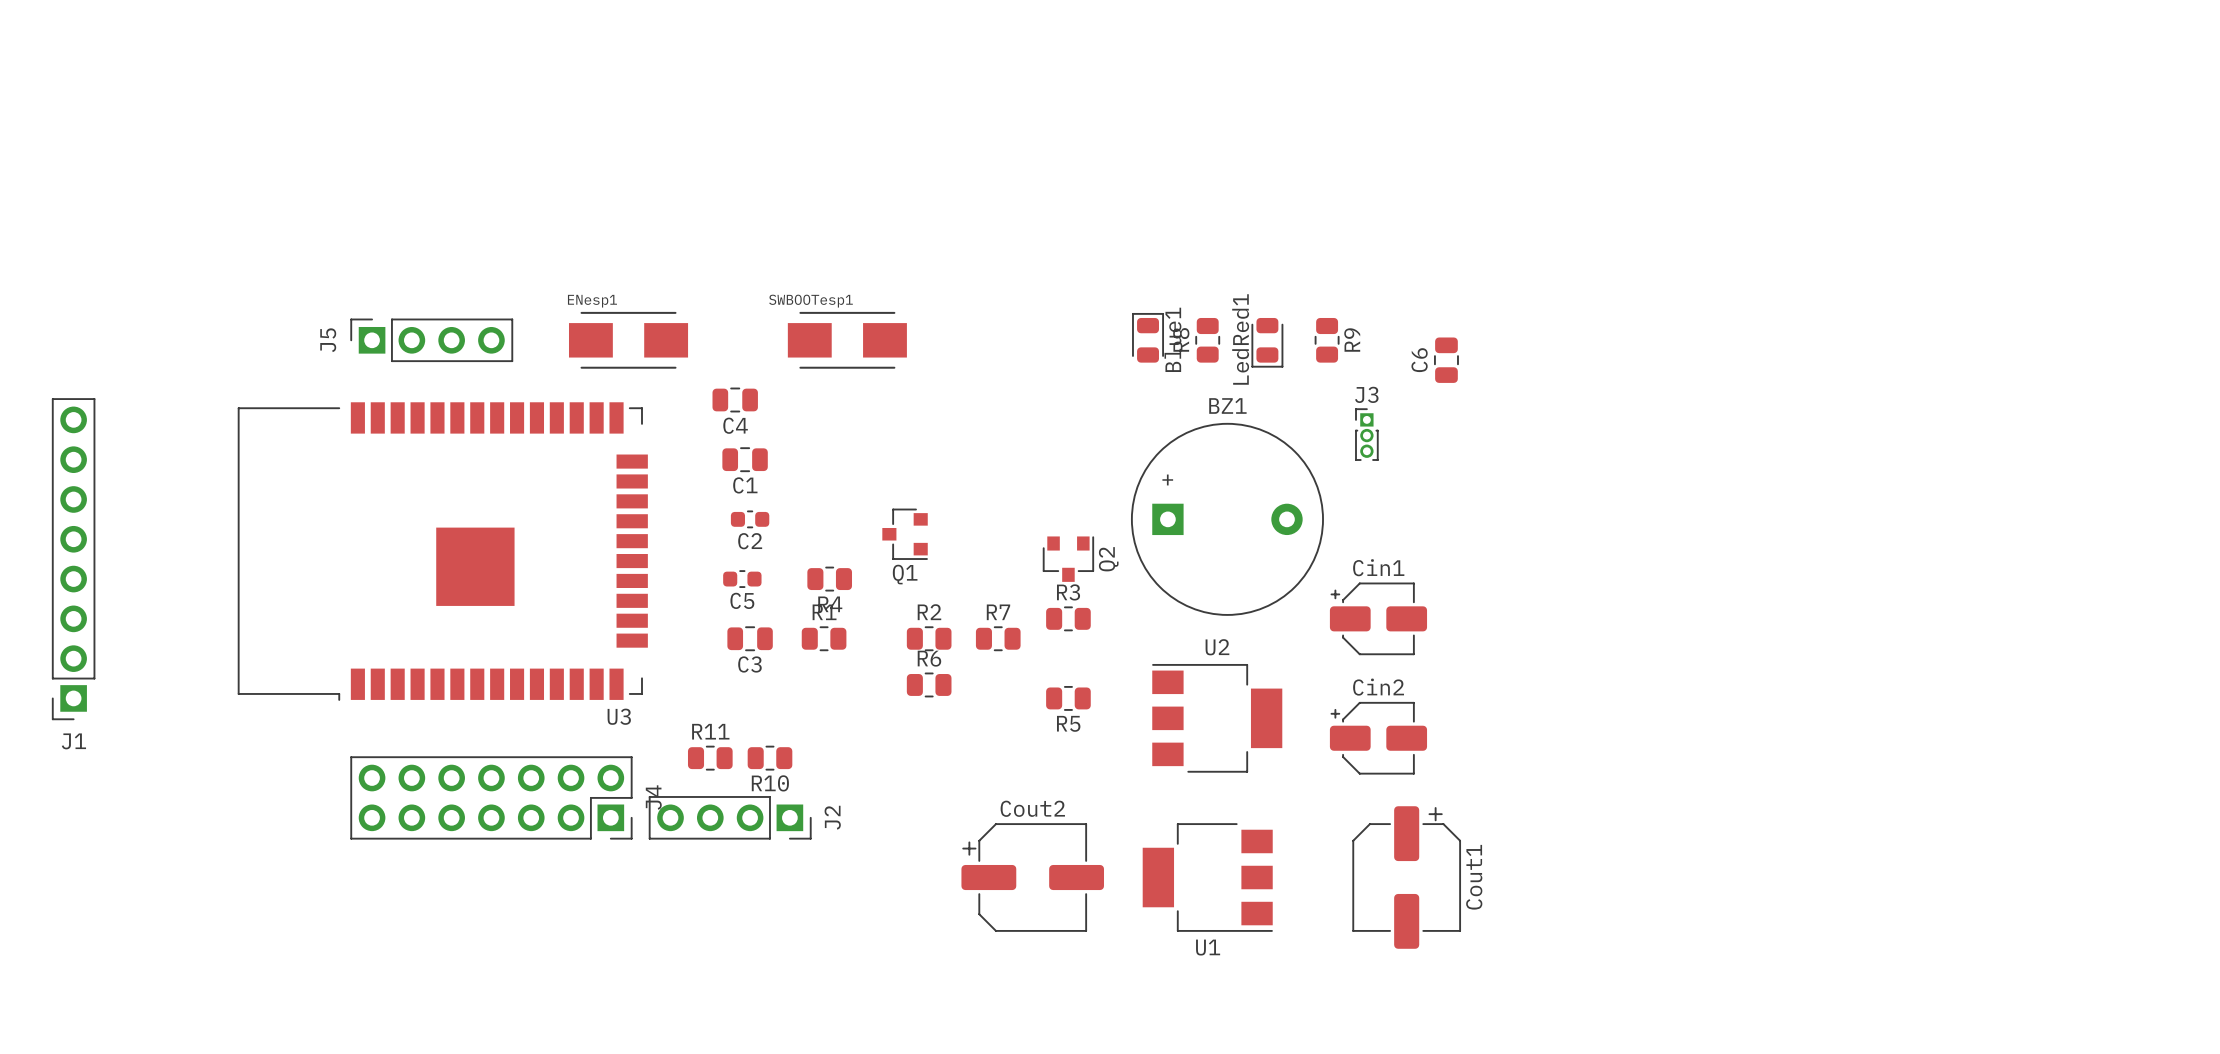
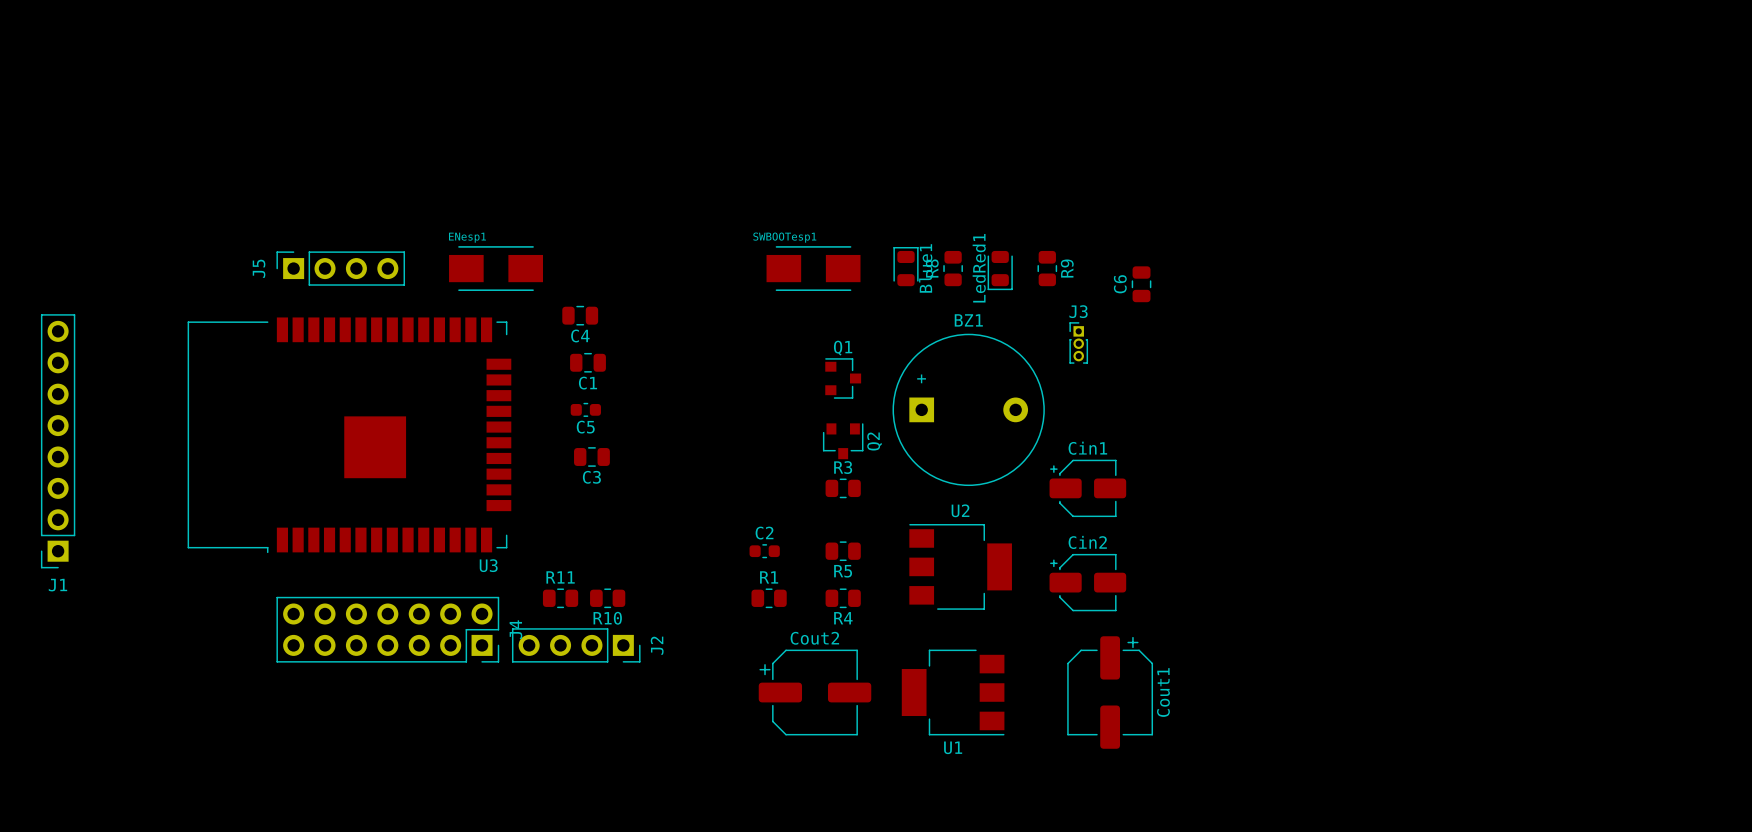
SWBOOTesp1 position: (847, 340) -> (813, 268)
C2 position: (750, 519) -> (764, 551)
Q1 rotation: 0° (905, 534) -> 180° (843, 378)
Q1 position: (905, 534) -> (843, 378)
C2 name position: C2 (750, 541) -> C2 (764, 533)
C5 position: (742, 579) -> (585, 409)
R4 position: (829, 579) -> (843, 598)
C3 position: (750, 638) -> (591, 456)
R1 position: (824, 638) -> (769, 598)
R2: (929, 638) -> none
R7: (998, 638) -> none
R6: (929, 684) -> none

